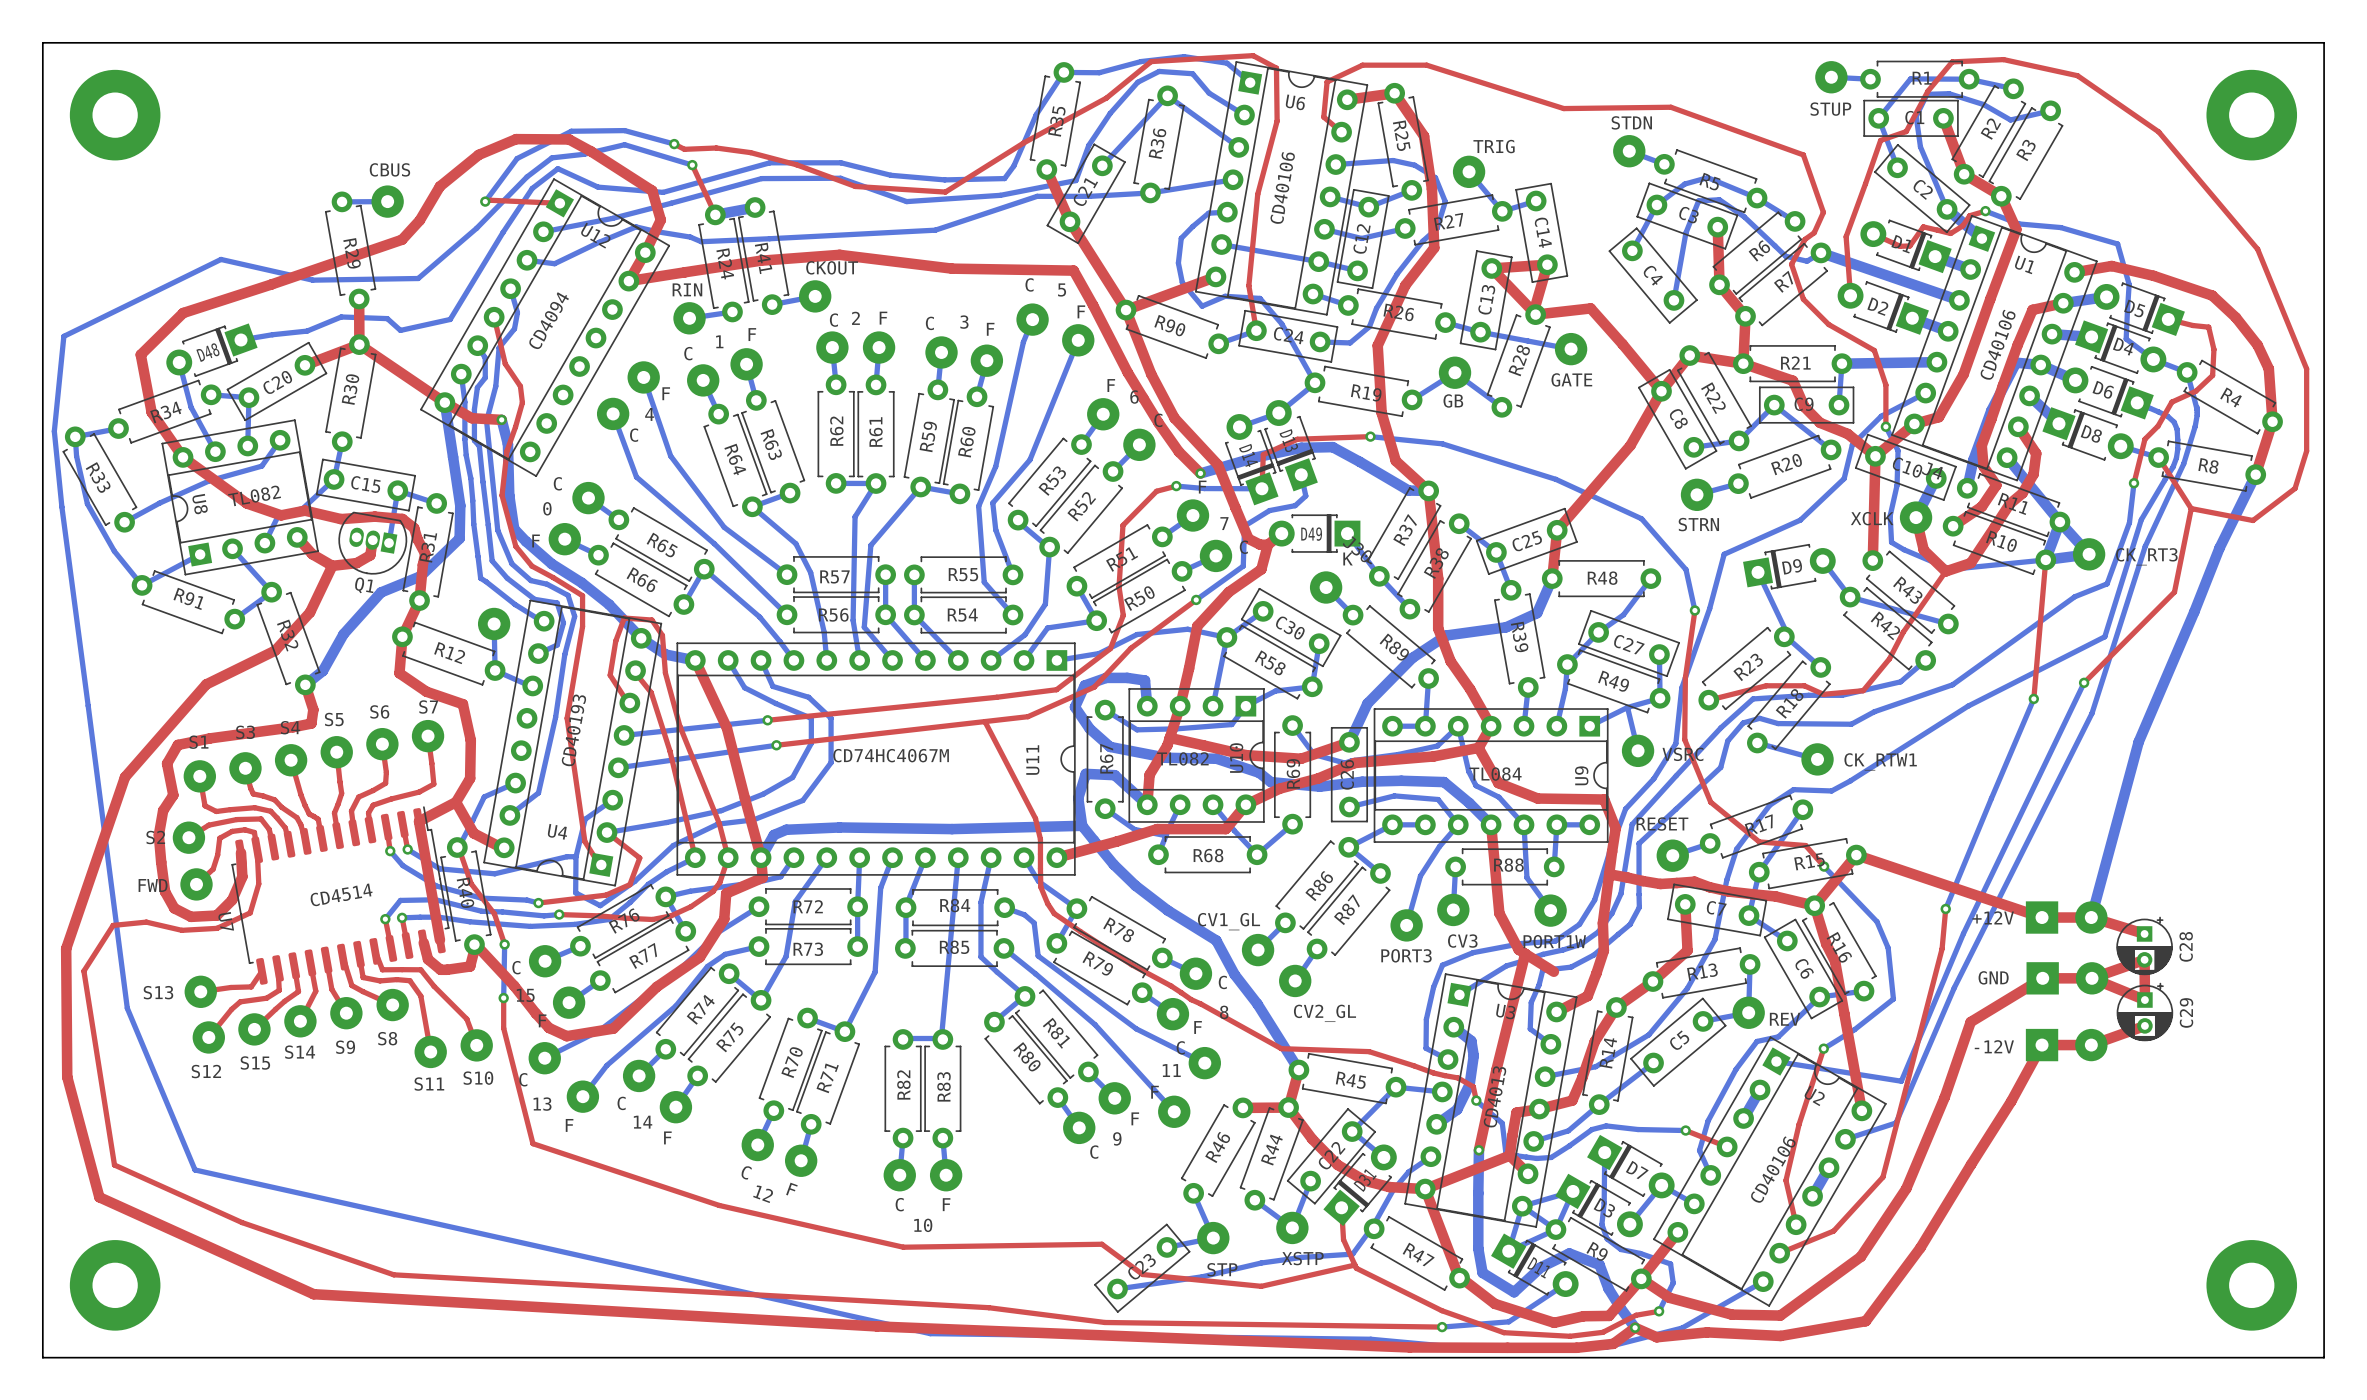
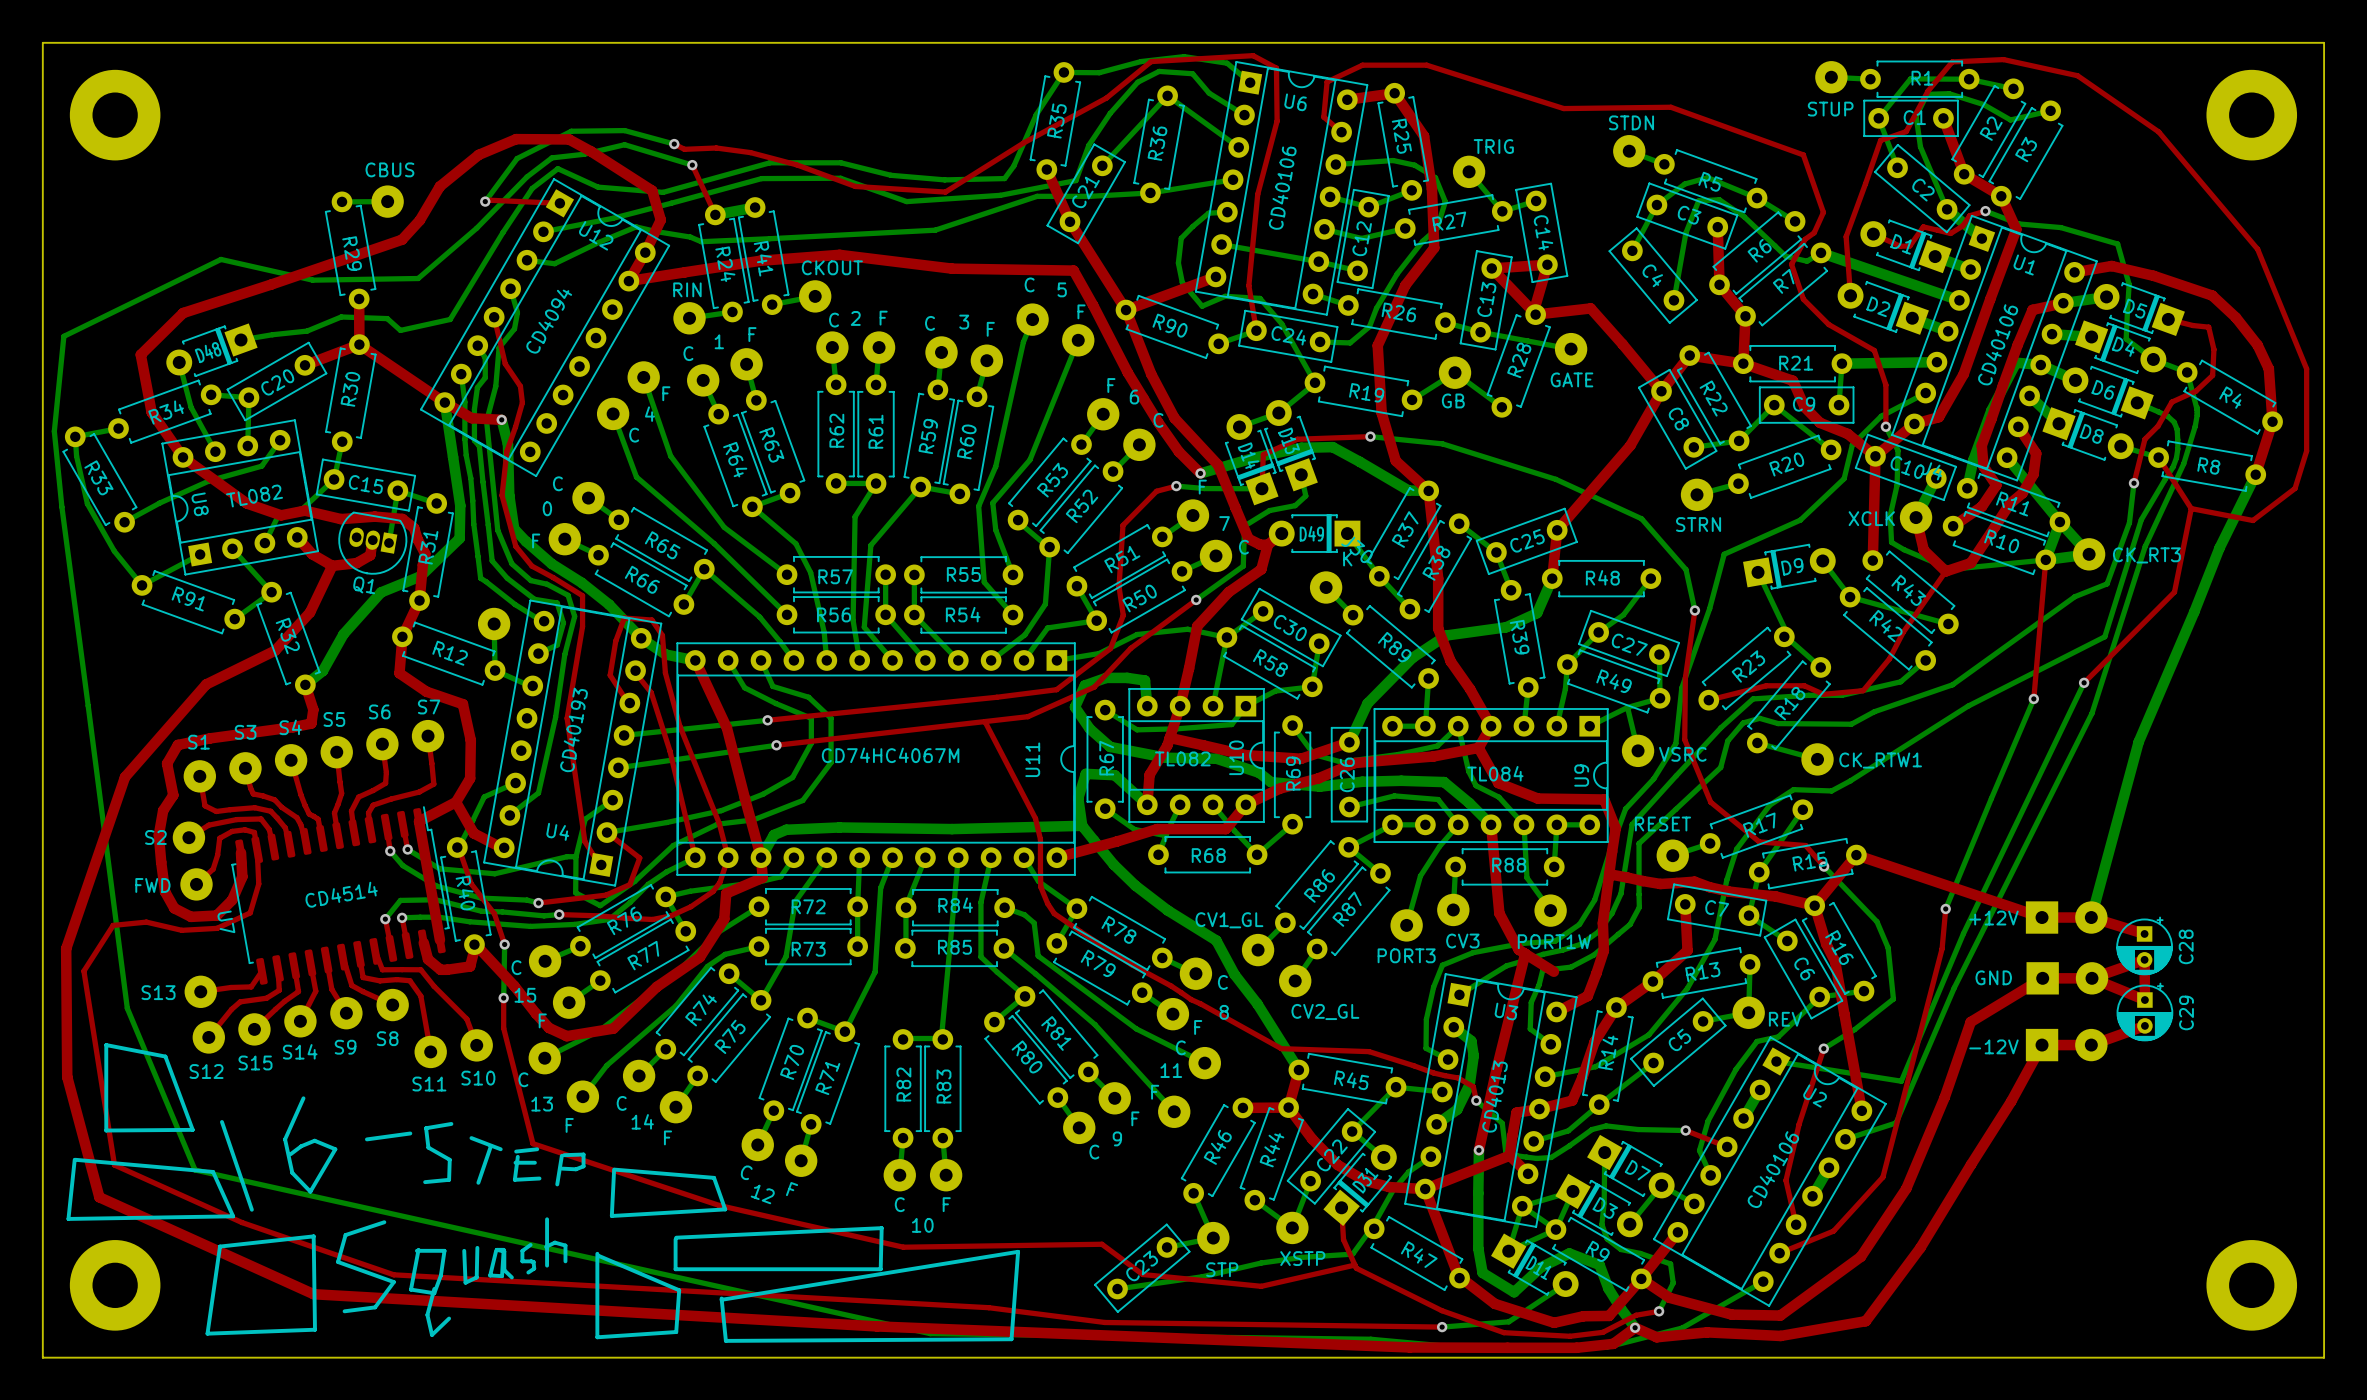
line: none -> (106, 1045) (165, 1056) (192, 1129) (106, 1130) (106, 1045)
line: none -> (303, 1098) (285, 1139) (292, 1172) (310, 1191) (335, 1149) (314, 1140) (301, 1146) (290, 1154)
line: none -> (221, 1121) (251, 1209)
line: none -> (451, 1123) (426, 1128) (428, 1147) (449, 1159) (449, 1179) (425, 1182)
line: none -> (410, 1133) (366, 1139)
line: none -> (471, 1138) (500, 1149)
line: none -> (490, 1146) (478, 1182)
line: none -> (537, 1149) (516, 1151)
line: none -> (561, 1155) (557, 1184)
line: none -> (564, 1155) (583, 1154) (583, 1166) (575, 1169) (562, 1168)
line: none -> (517, 1156) (514, 1179) (539, 1178)
line: none -> (74, 1159) (68, 1218) (233, 1216) (213, 1171) (75, 1159)
line: none -> (515, 1162) (534, 1162)
line: none -> (614, 1169) (611, 1215) (725, 1209) (714, 1177) (614, 1169)
line: none -> (547, 1219) (547, 1265)
line: none -> (384, 1222) (345, 1235) (338, 1262) (393, 1282) (375, 1307) (344, 1311)
line: none -> (313, 1236) (220, 1246) (207, 1333) (315, 1329) (313, 1236)
line: none -> (676, 1237) (881, 1228) (880, 1269) (675, 1269) (675, 1239)
line: none -> (530, 1244) (522, 1250) (522, 1261) (533, 1262) (534, 1268) (528, 1272)
line: none -> (546, 1246) (554, 1242) (565, 1245) (565, 1261)
line: none -> (477, 1247) (476, 1277) (465, 1282) (464, 1250)
line: none -> (418, 1249) (410, 1289) (434, 1293) (440, 1275) (444, 1250) (416, 1250)
line: none -> (496, 1250) (490, 1275) (502, 1276) (503, 1249) (496, 1249) (504, 1251) (504, 1270) (511, 1277)
line: none -> (597, 1253) (597, 1337) (676, 1332) (679, 1290) (599, 1256)
line: none -> (434, 1288) (427, 1314) (432, 1334) (449, 1318)
line: none -> (721, 1298) (725, 1340) (1011, 1339) (1018, 1251) (721, 1299)

